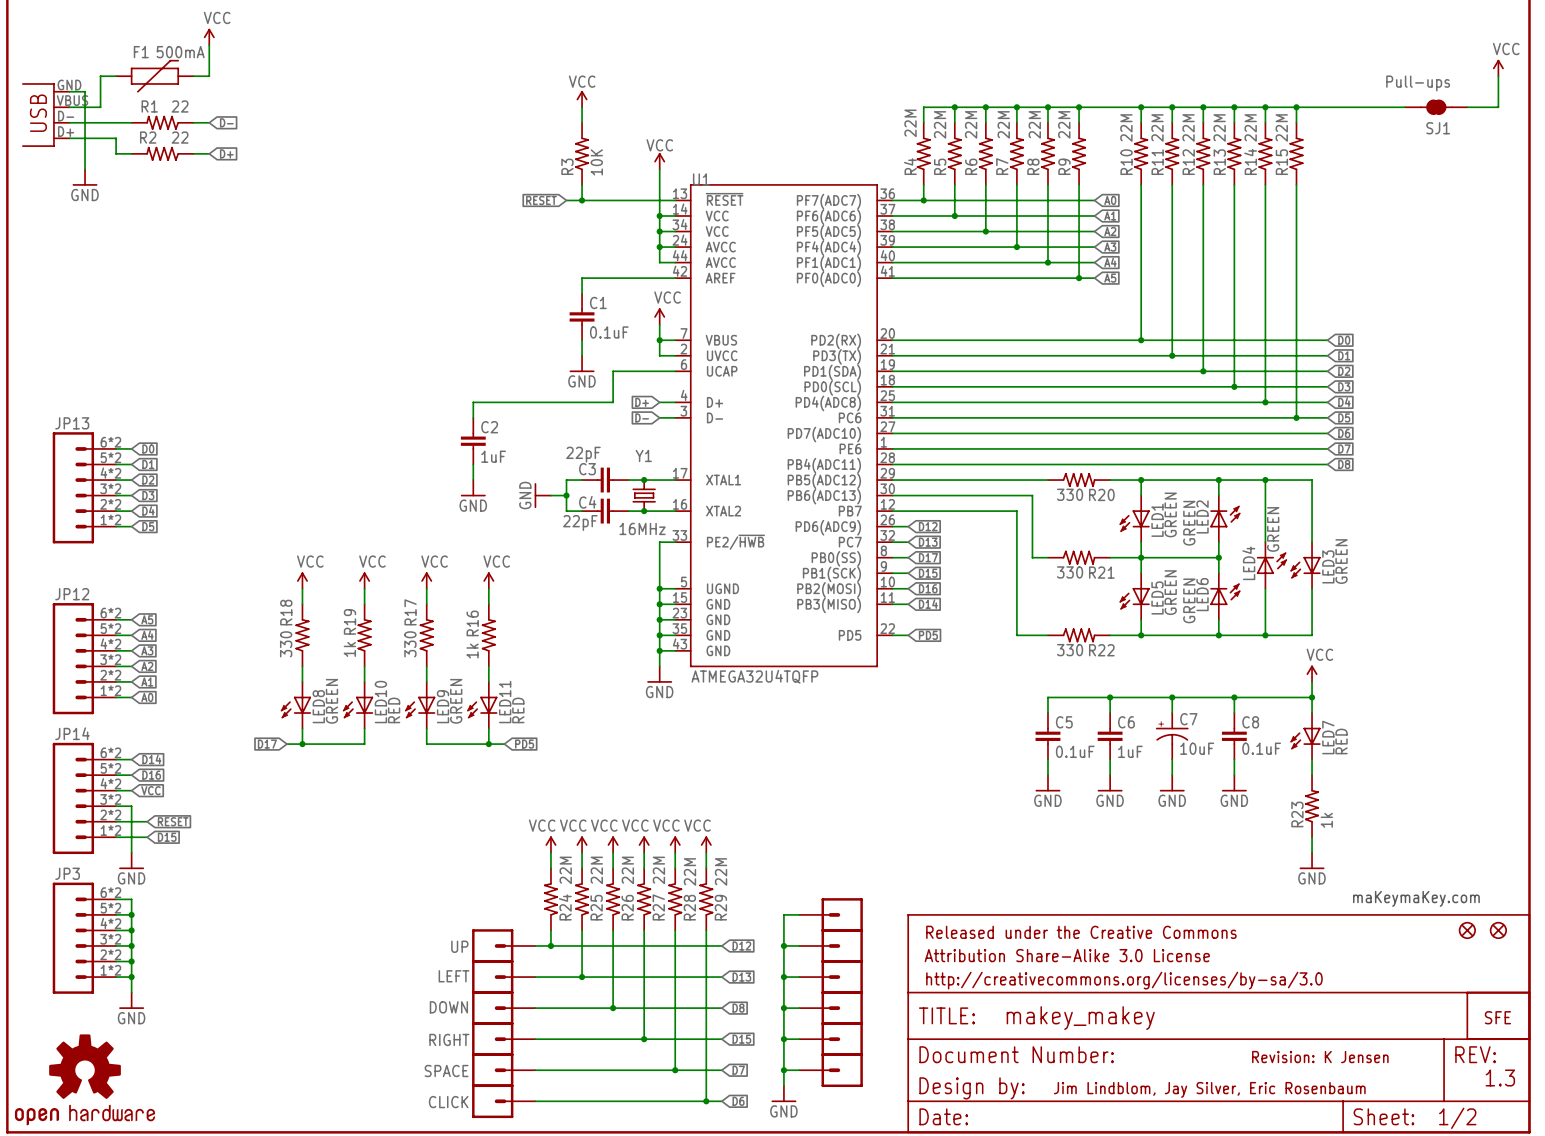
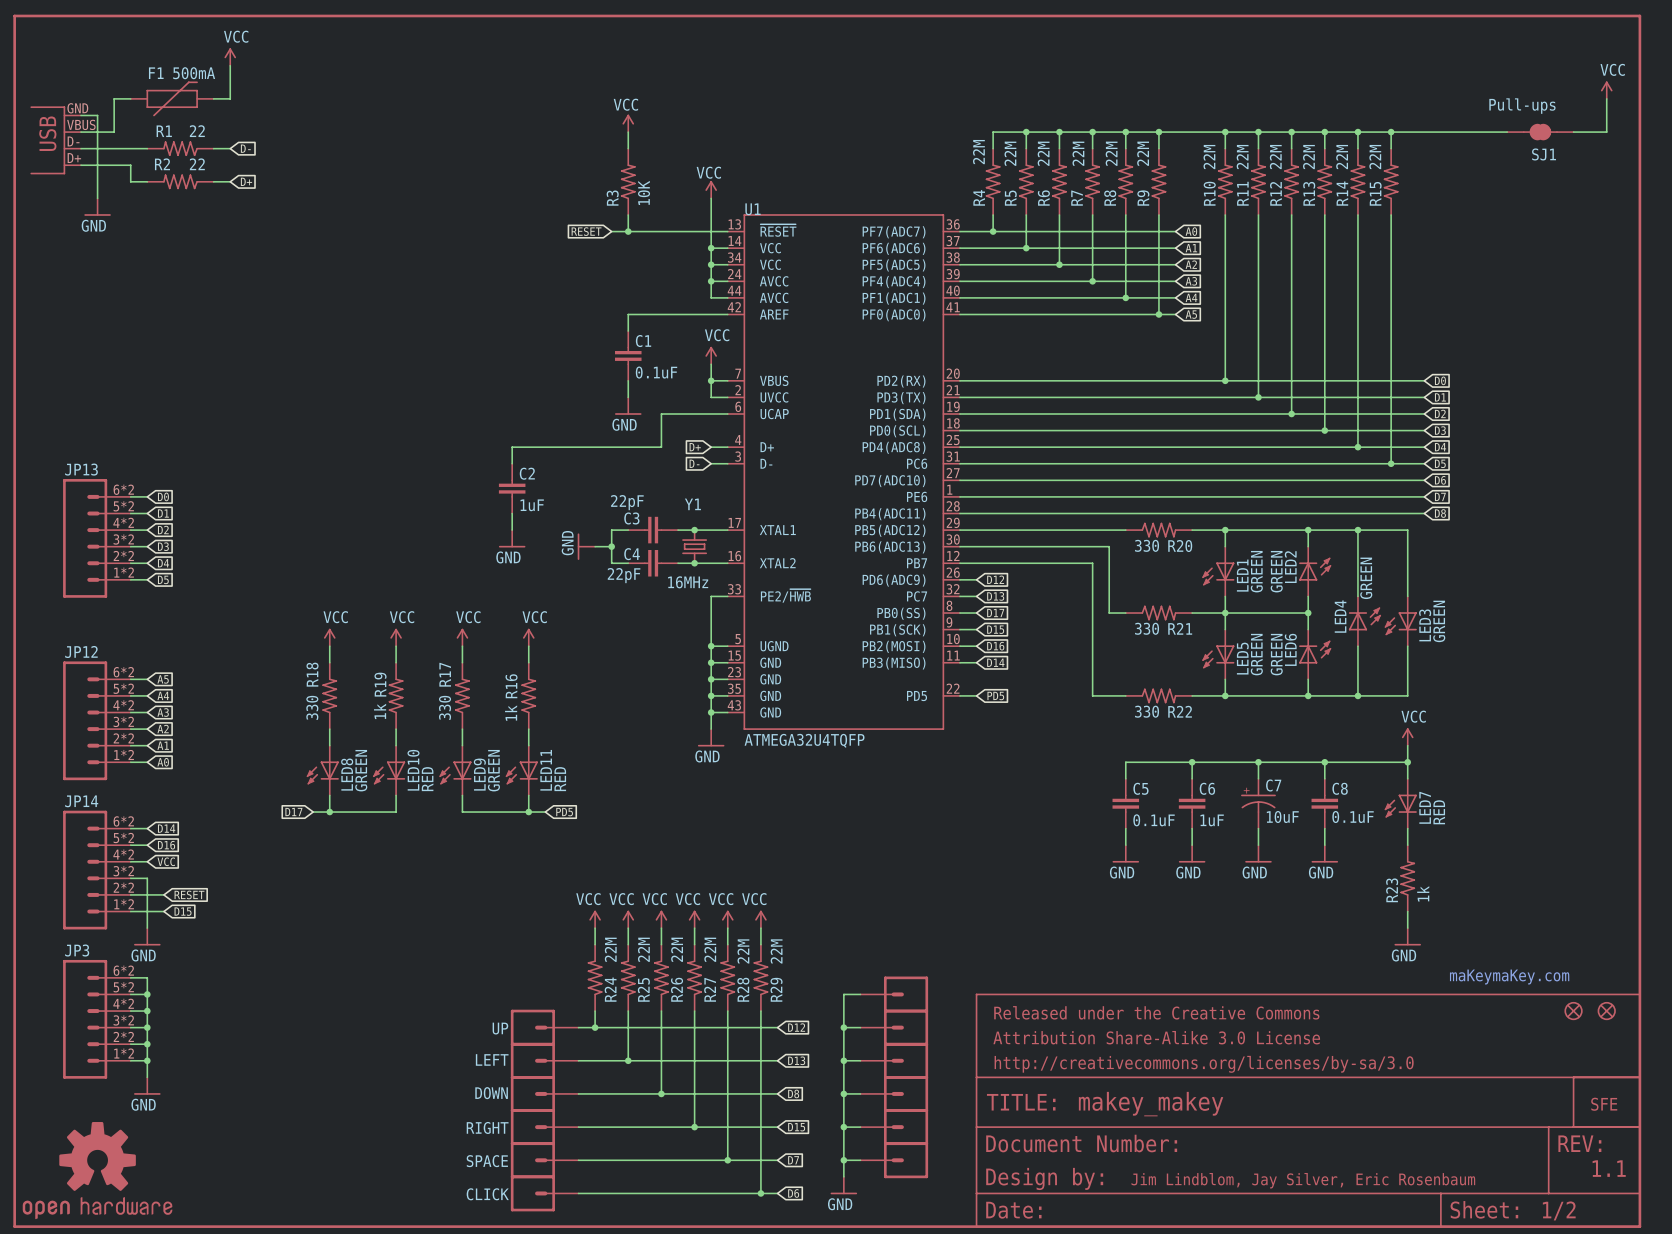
text: Revision: K Jensen (1320, 1057) -> none
text: 1.3 (1500, 1078) -> 1.1 (1609, 1168)

